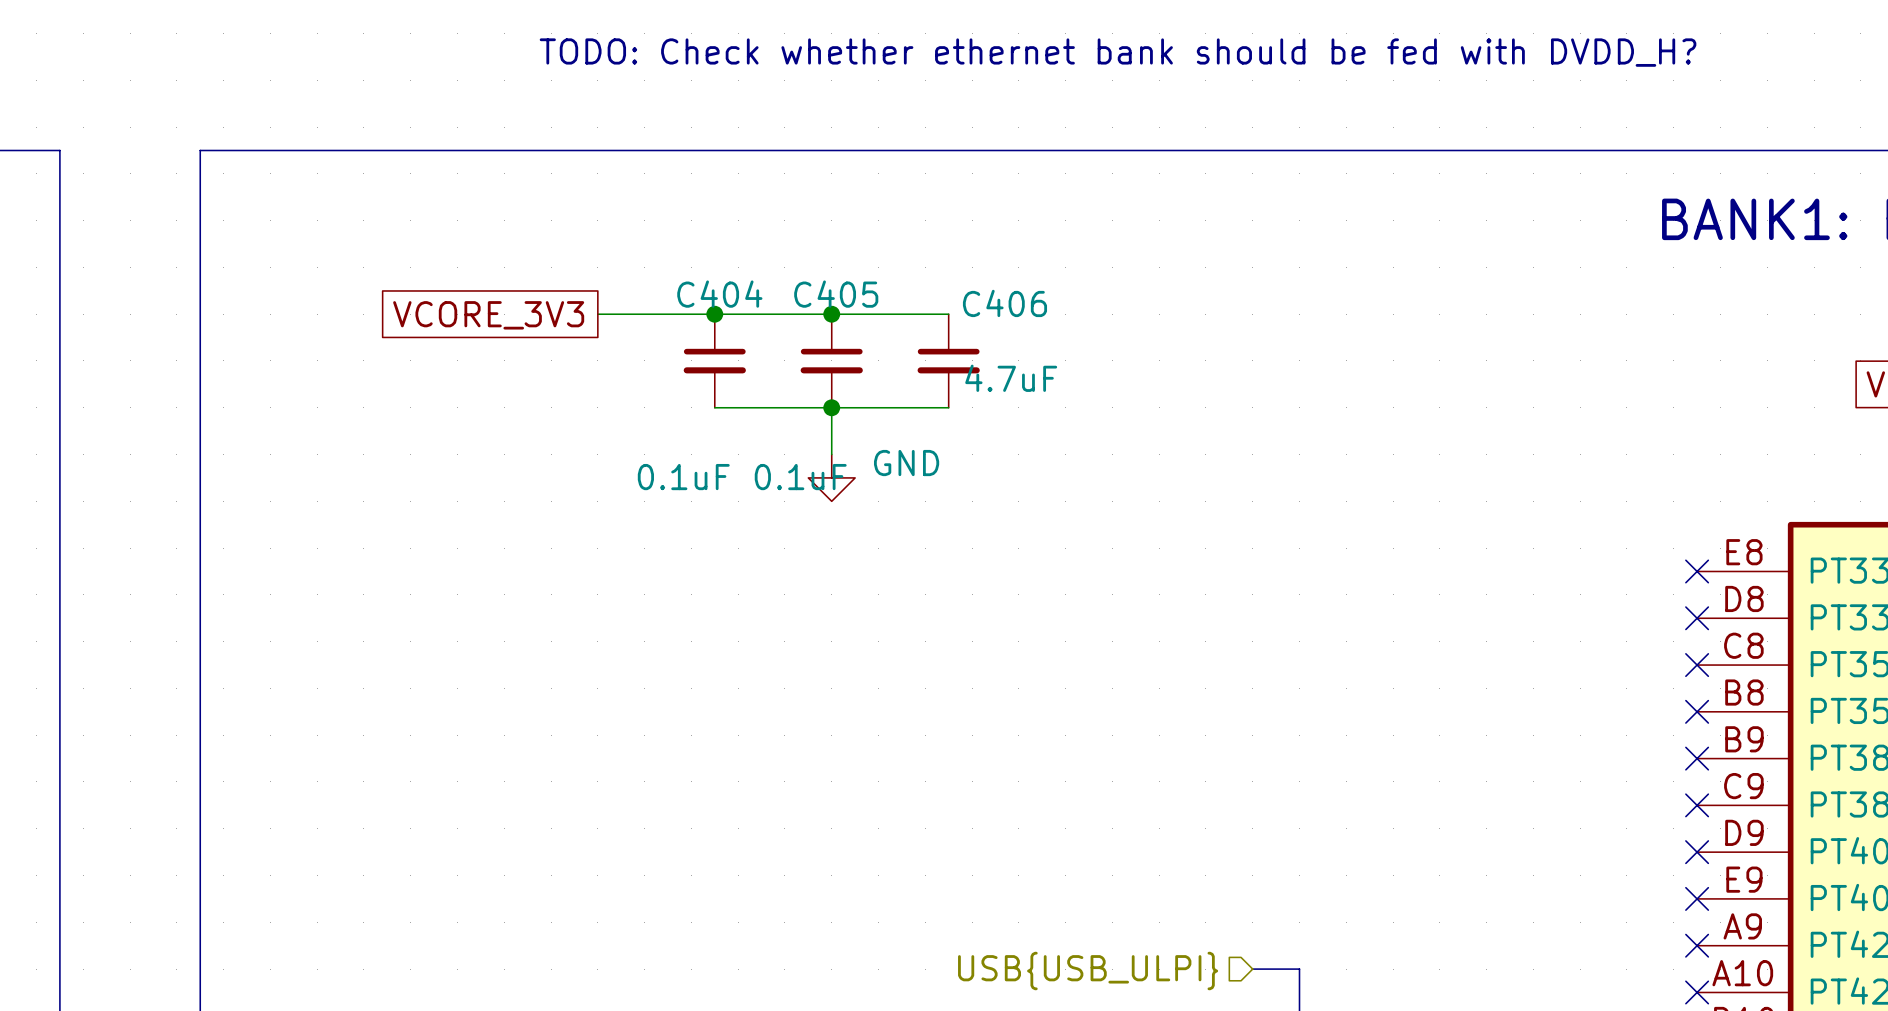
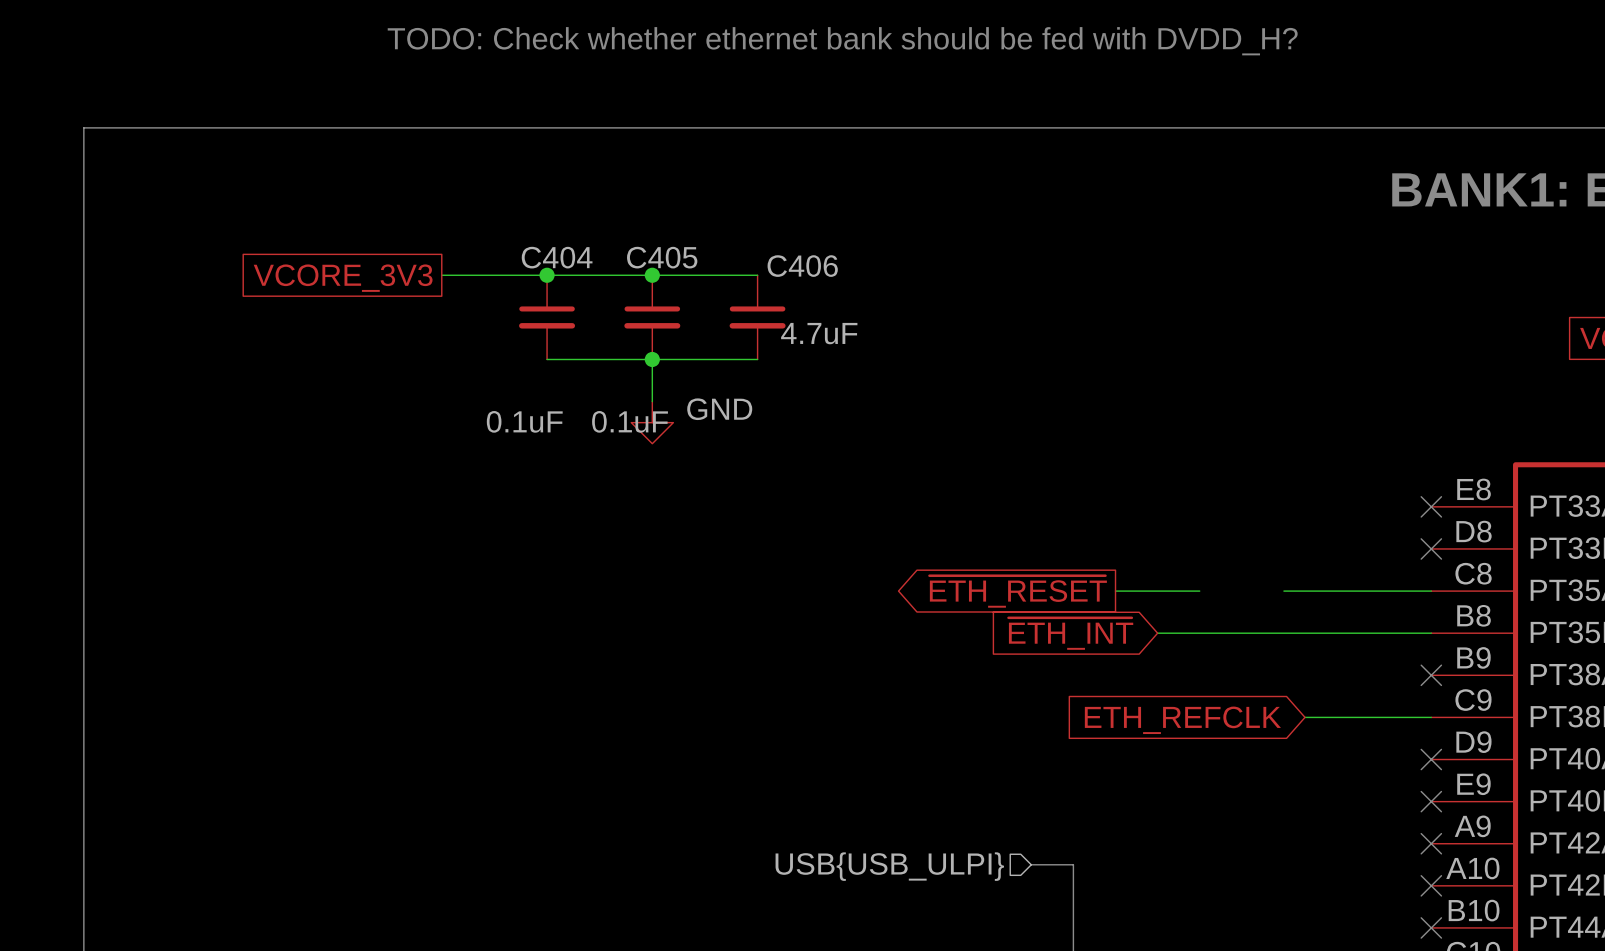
global label: none -> ~{ETH_RESET} (1018, 591)
wire: none -> (1115, 591) (1199, 591)
wire: none -> (1283, 591) (1431, 591)
no-connect mark: (1697, 665) -> none
global label: none -> ~{ETH_INT} (1070, 633)
wire: none -> (1157, 633) (1431, 633)
no-connect mark: (1697, 711) -> none
wire: none -> (1304, 717) (1431, 717)
no-connect mark: (1697, 805) -> none
global label: none -> ETH_REFCLK (1182, 720)

